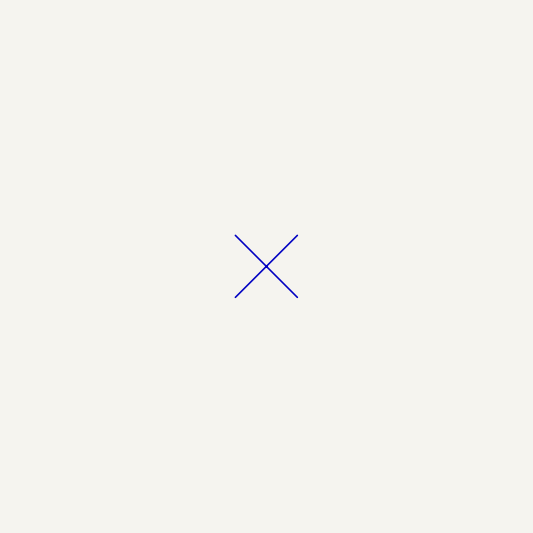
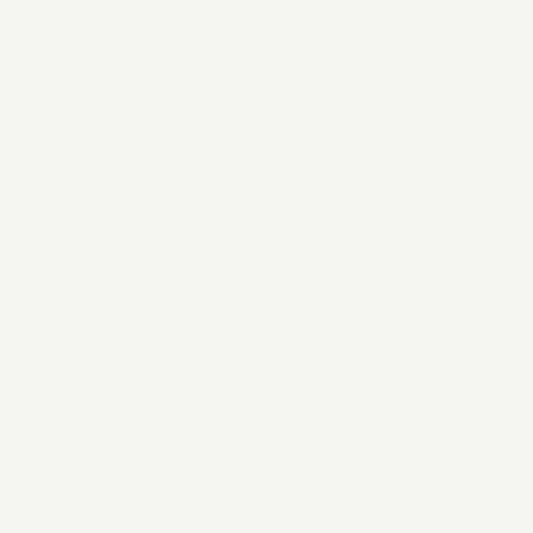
no-connect mark: (266, 266) -> none

